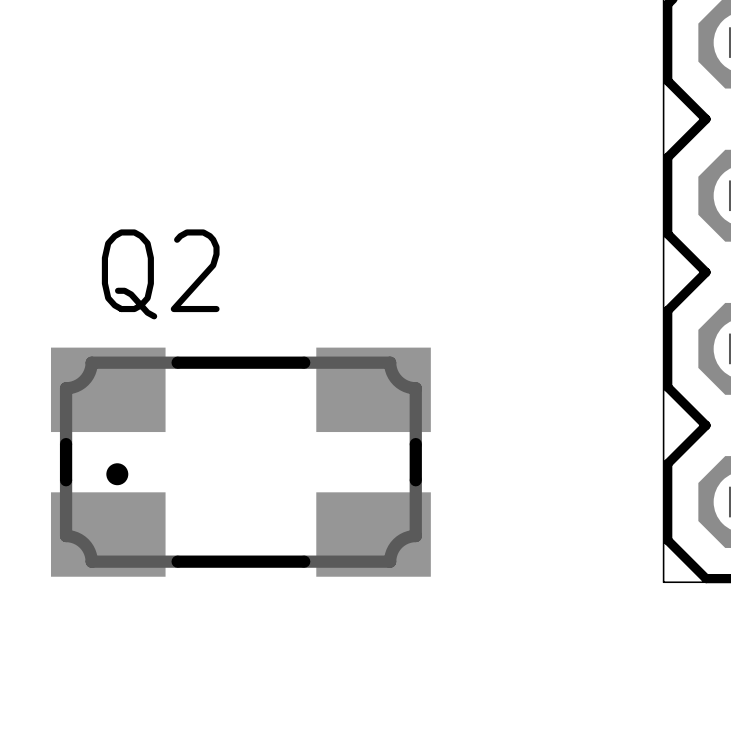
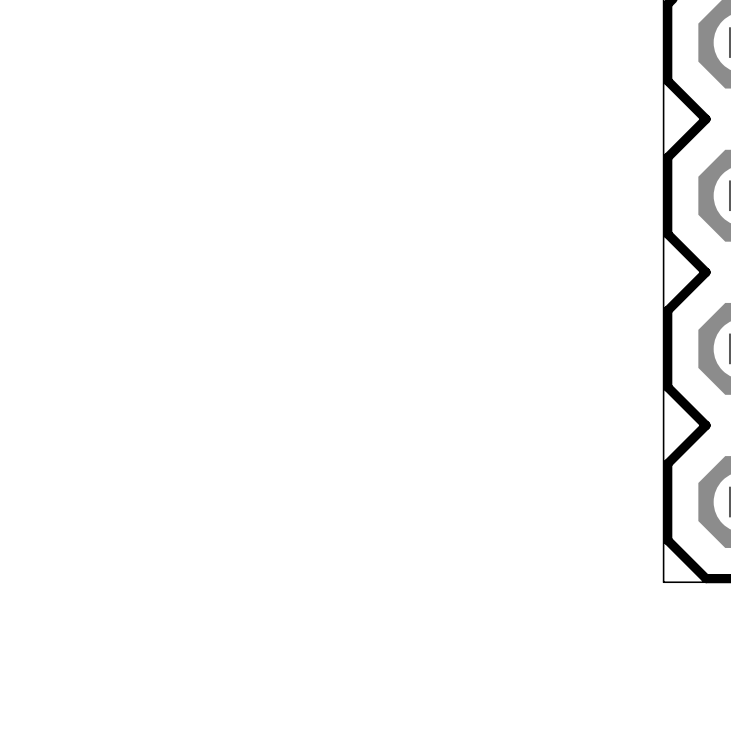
Q2: (240, 462) -> none

